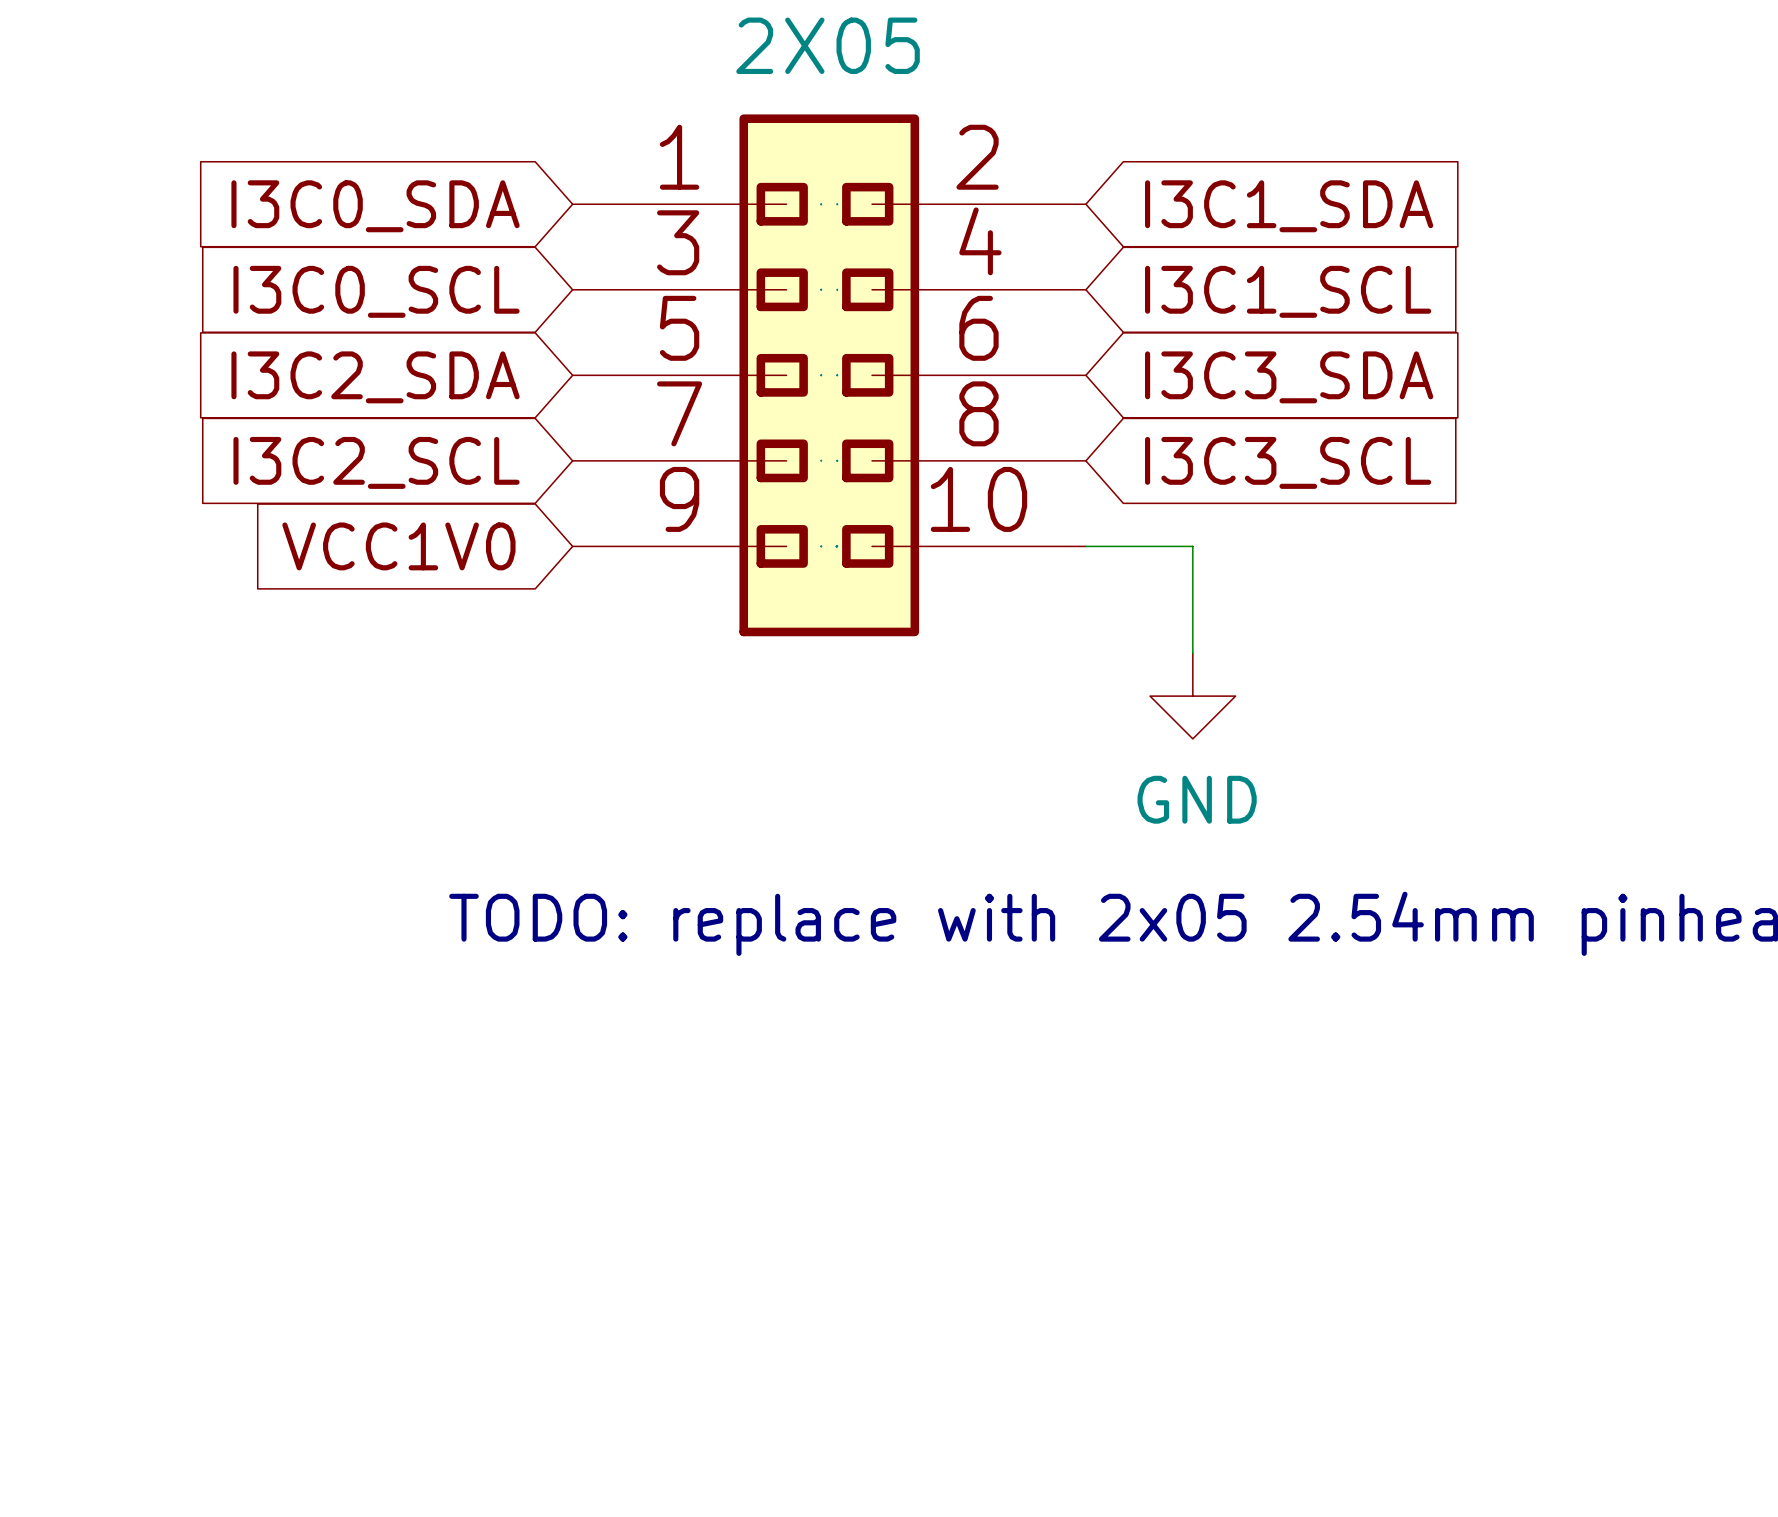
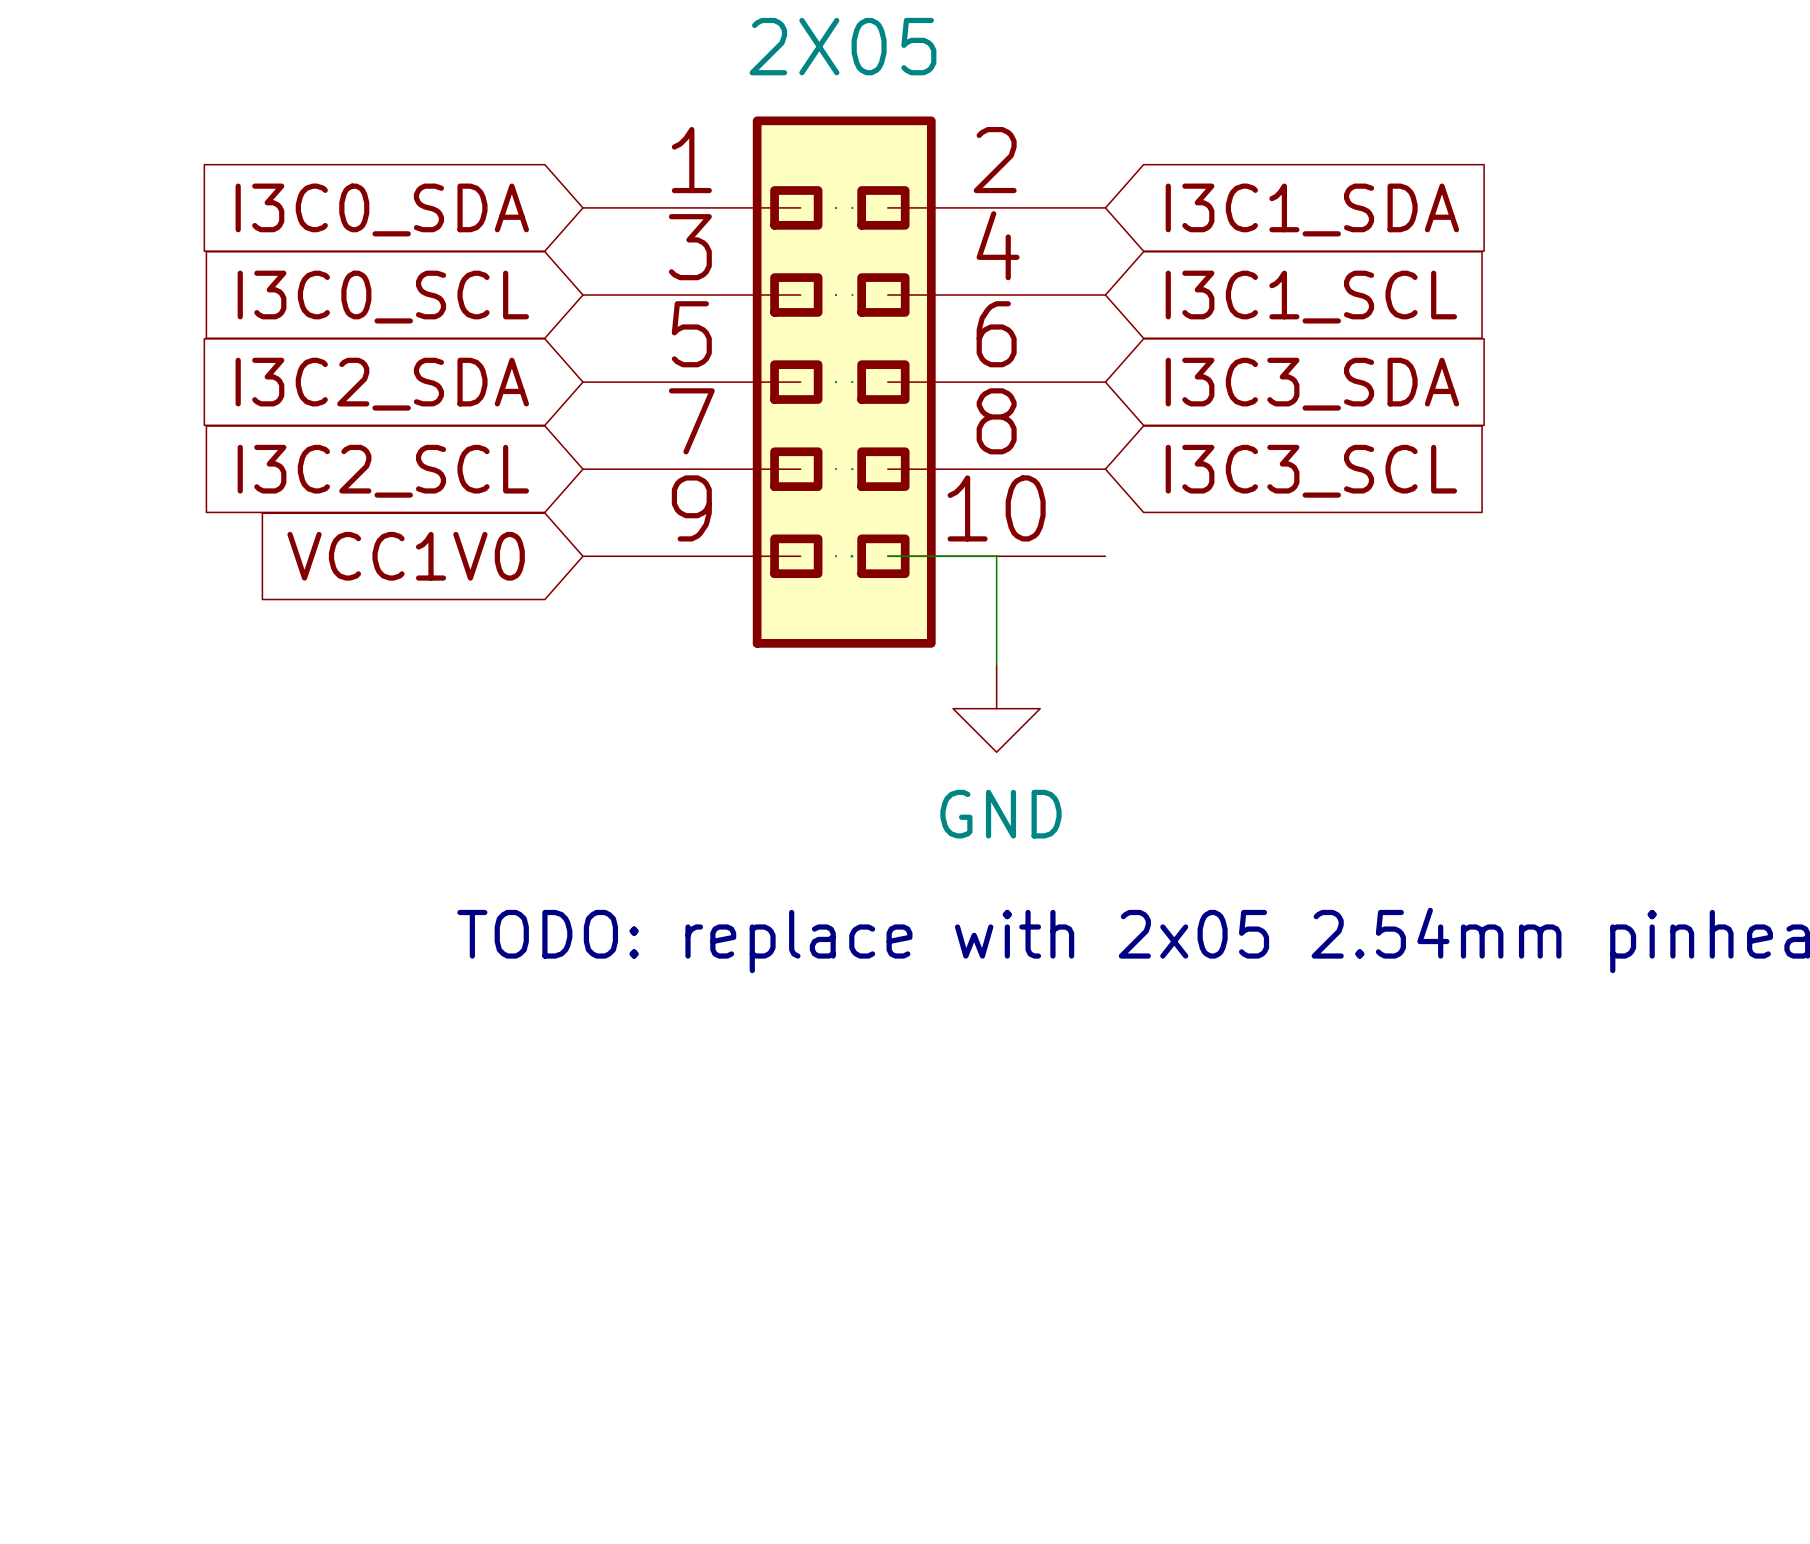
wire: (1085, 546) (1192, 546) (1192, 653) -> (887, 556) (996, 556) (996, 665)
power symbol position: GND (1192, 696) -> GND (996, 708)

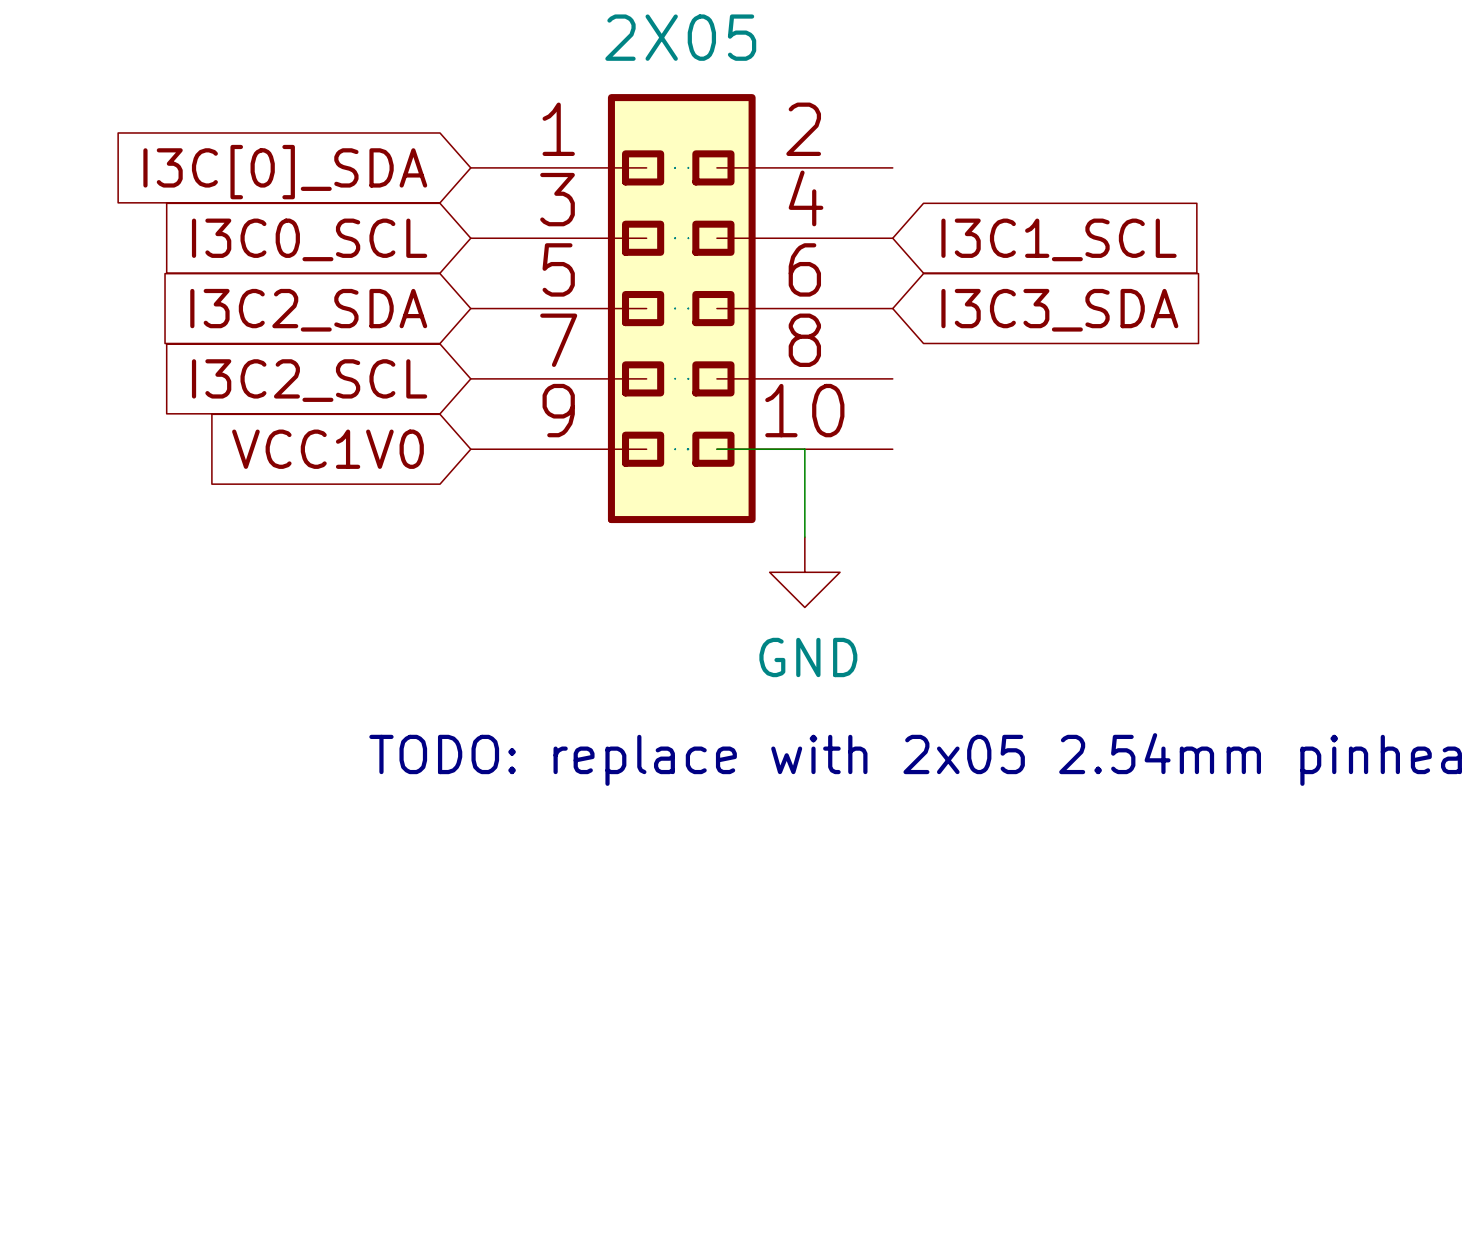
global label: I3C0_SDA (382, 209) -> I3C[0]_SDA (285, 172)
global label: I3C1_SDA (1312, 209) -> none
global label: I3C3_SCL (1311, 471) -> none

